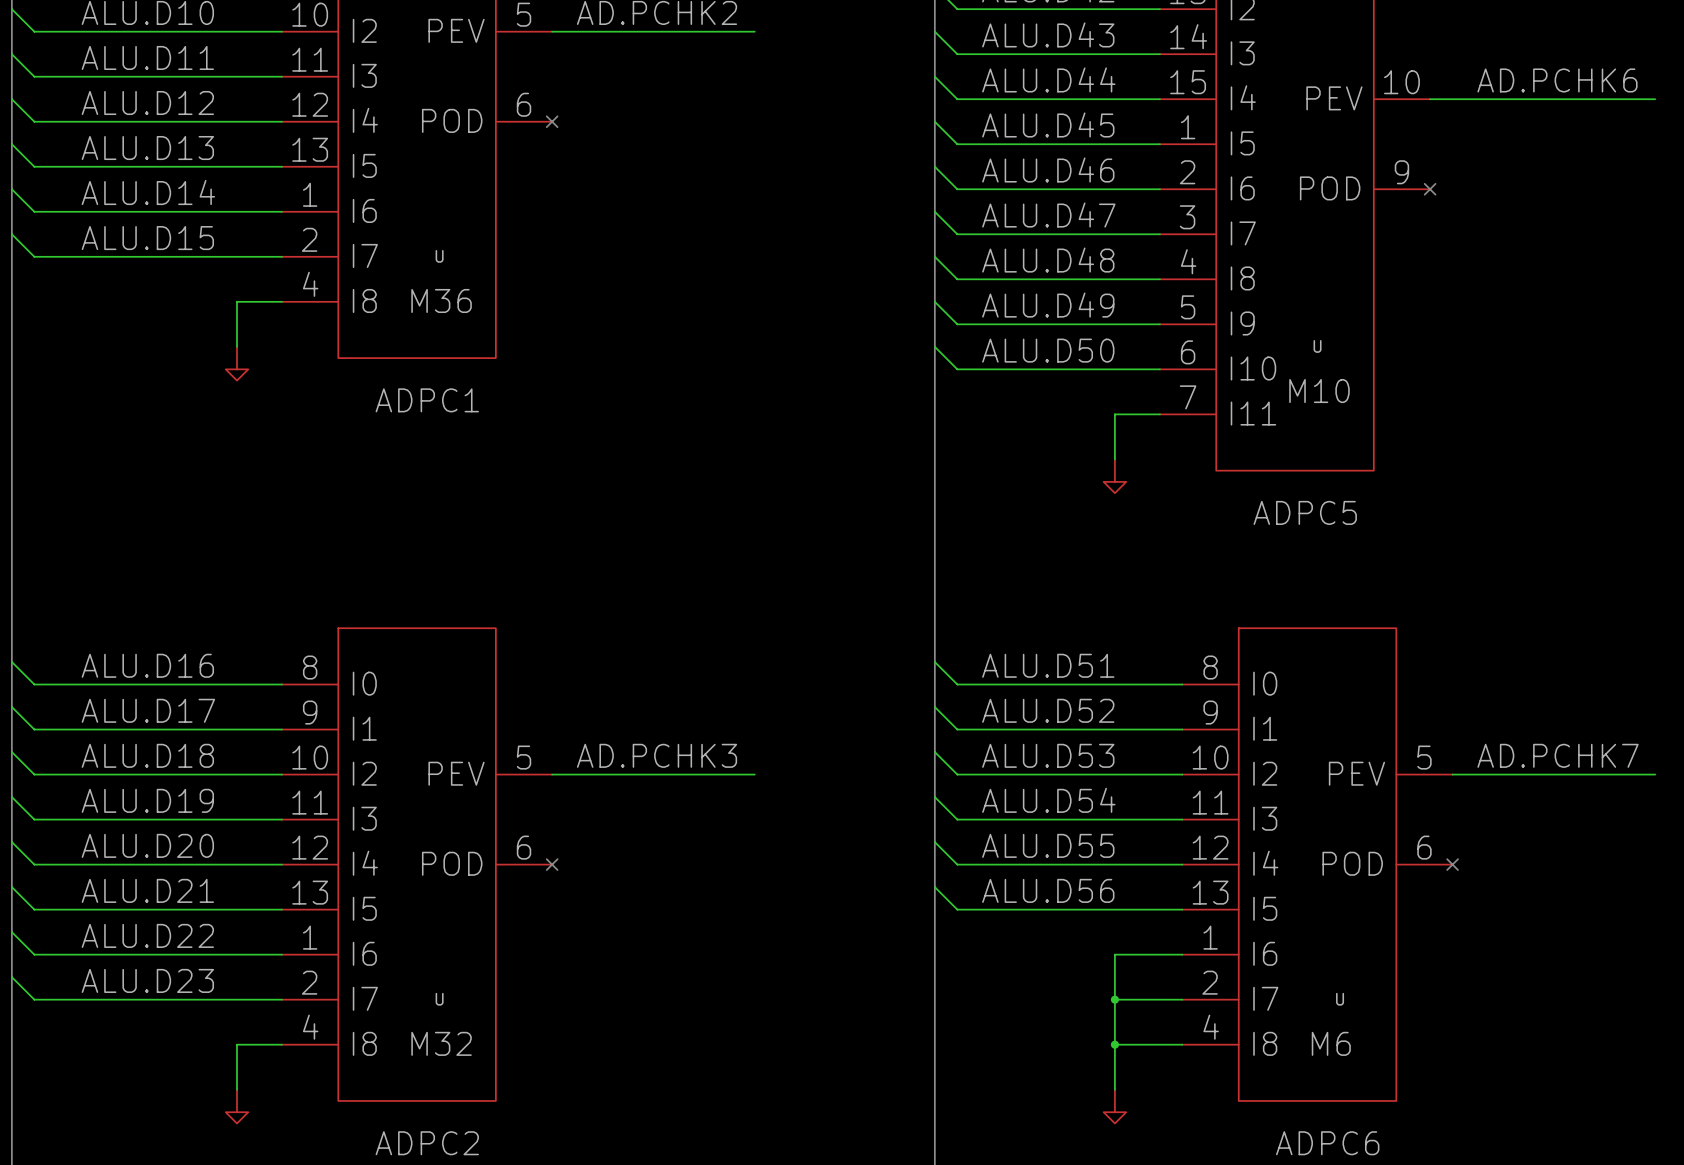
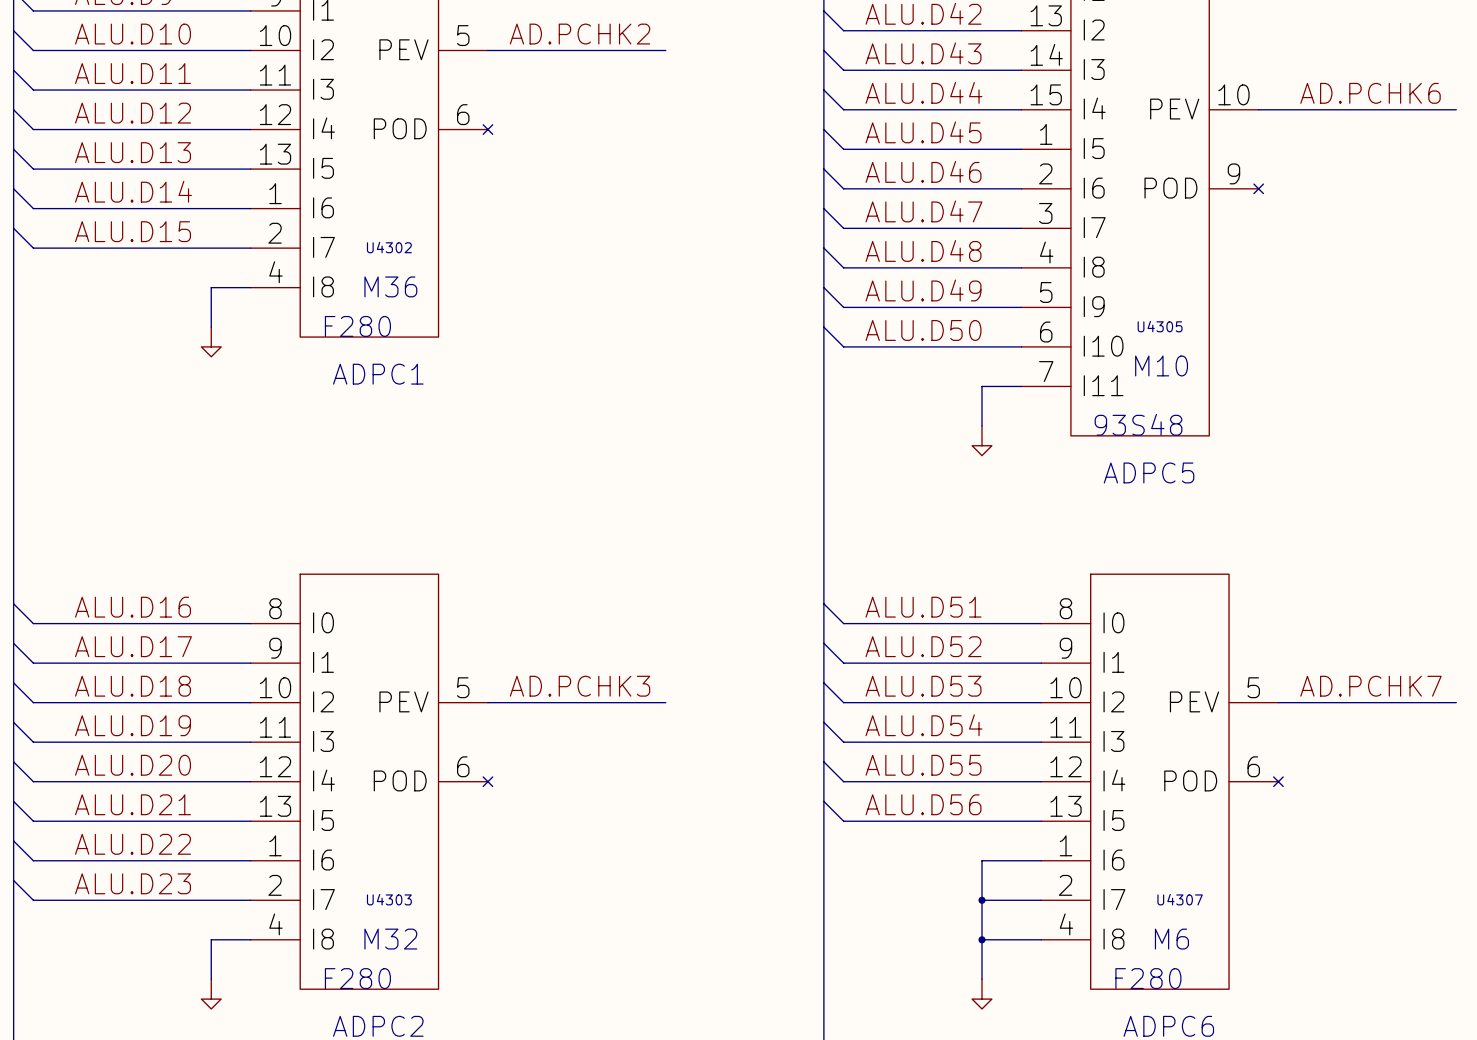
U name: U (439, 256) -> U4302 (389, 247)
U value: none -> F280 (357, 326)
U name: U (1317, 346) -> U4305 (1160, 326)
U value: none -> 93S48 (1138, 424)
U name: U (439, 999) -> U4303 (389, 899)
U name: U (1340, 999) -> U4307 (1180, 899)
U value: none -> F280 (357, 978)
U value: none -> F280 (1148, 978)

